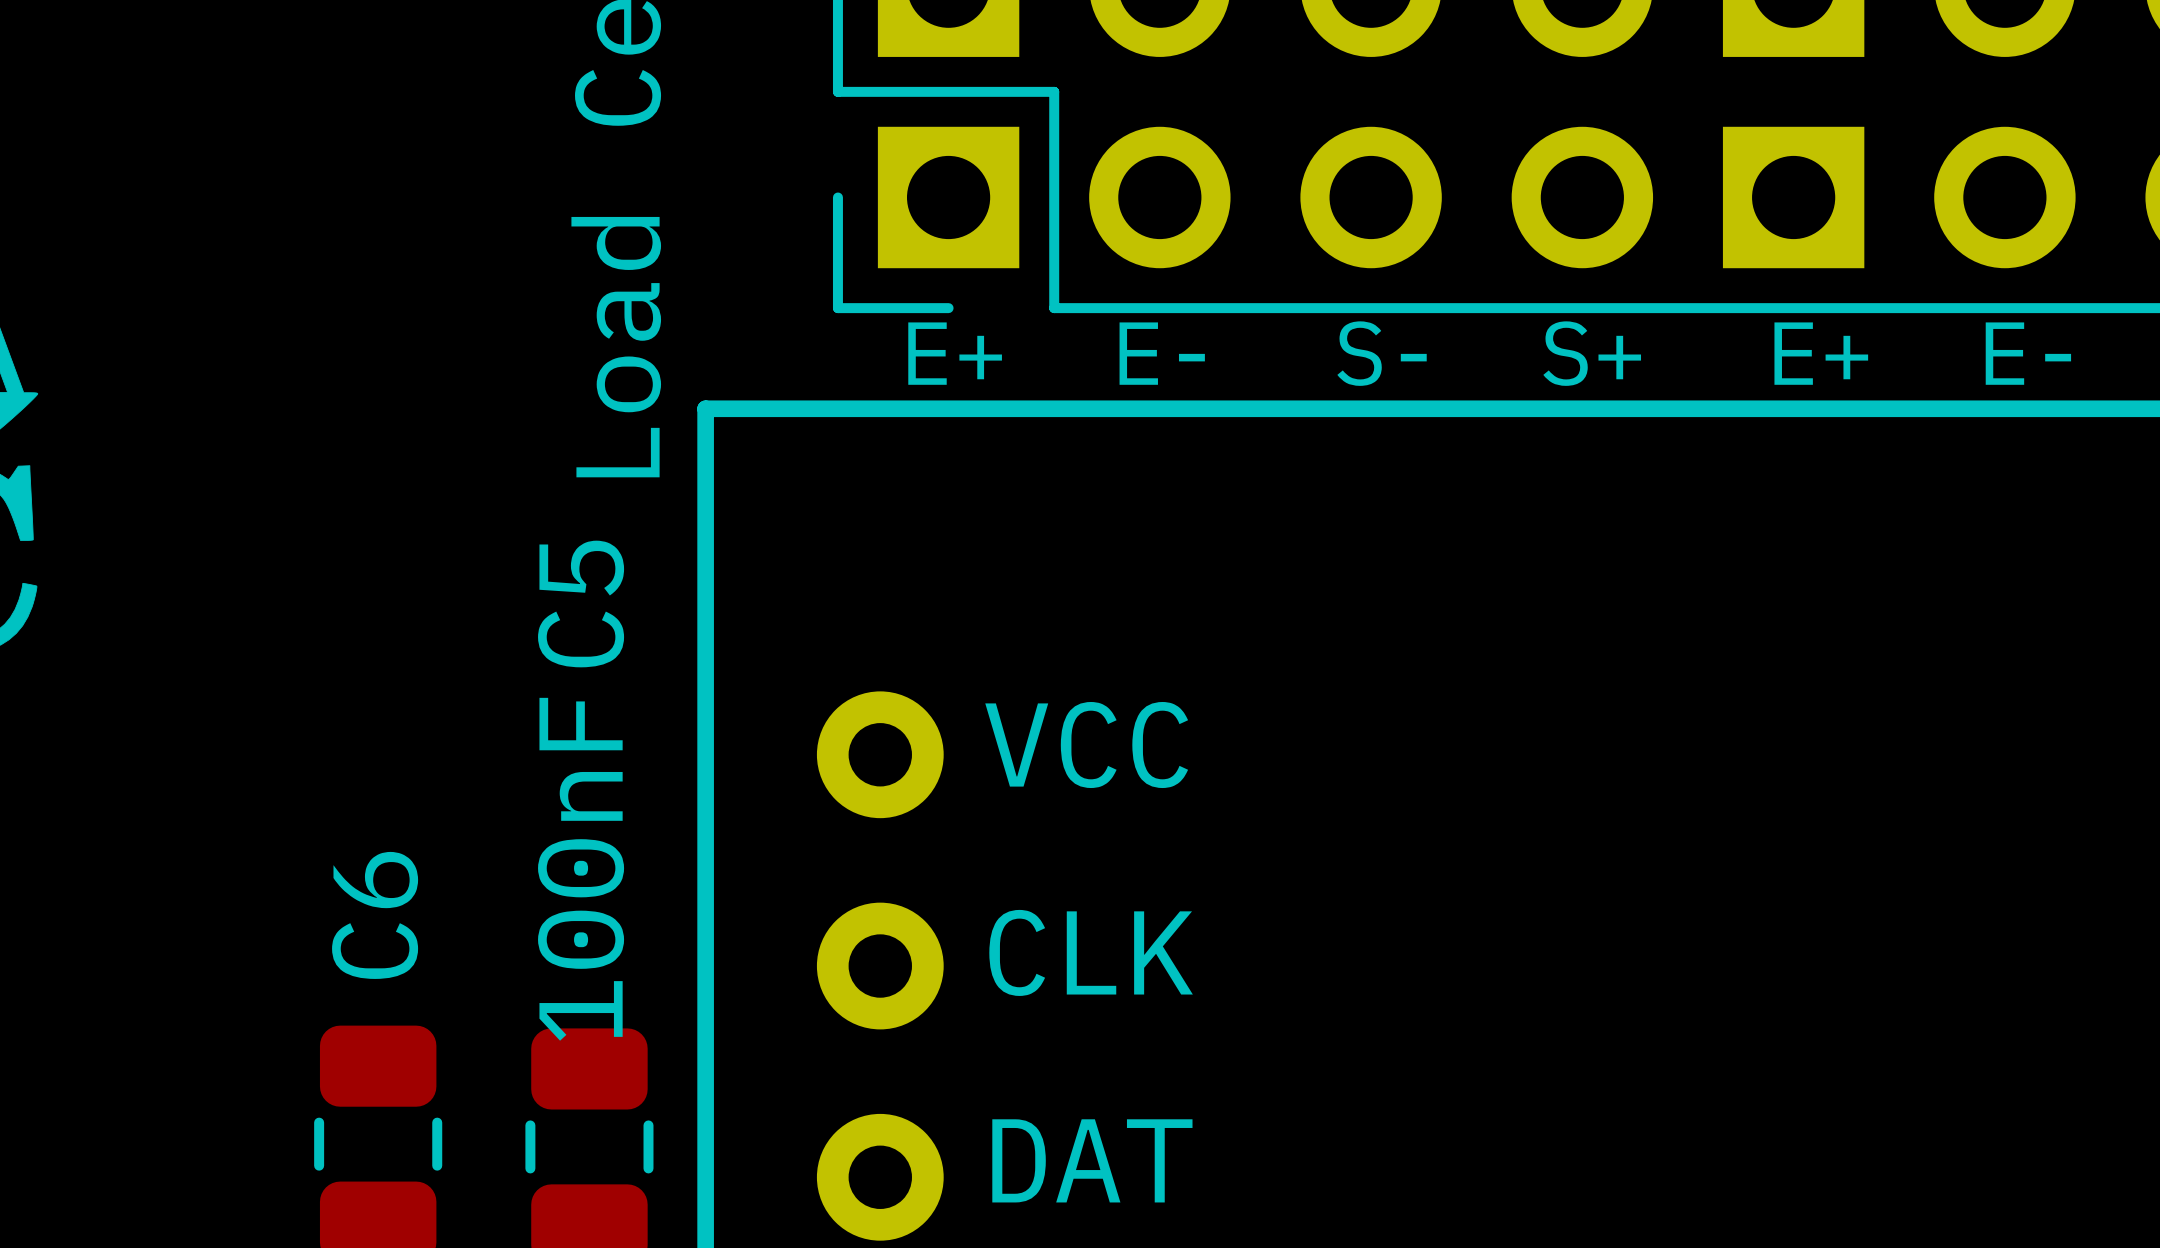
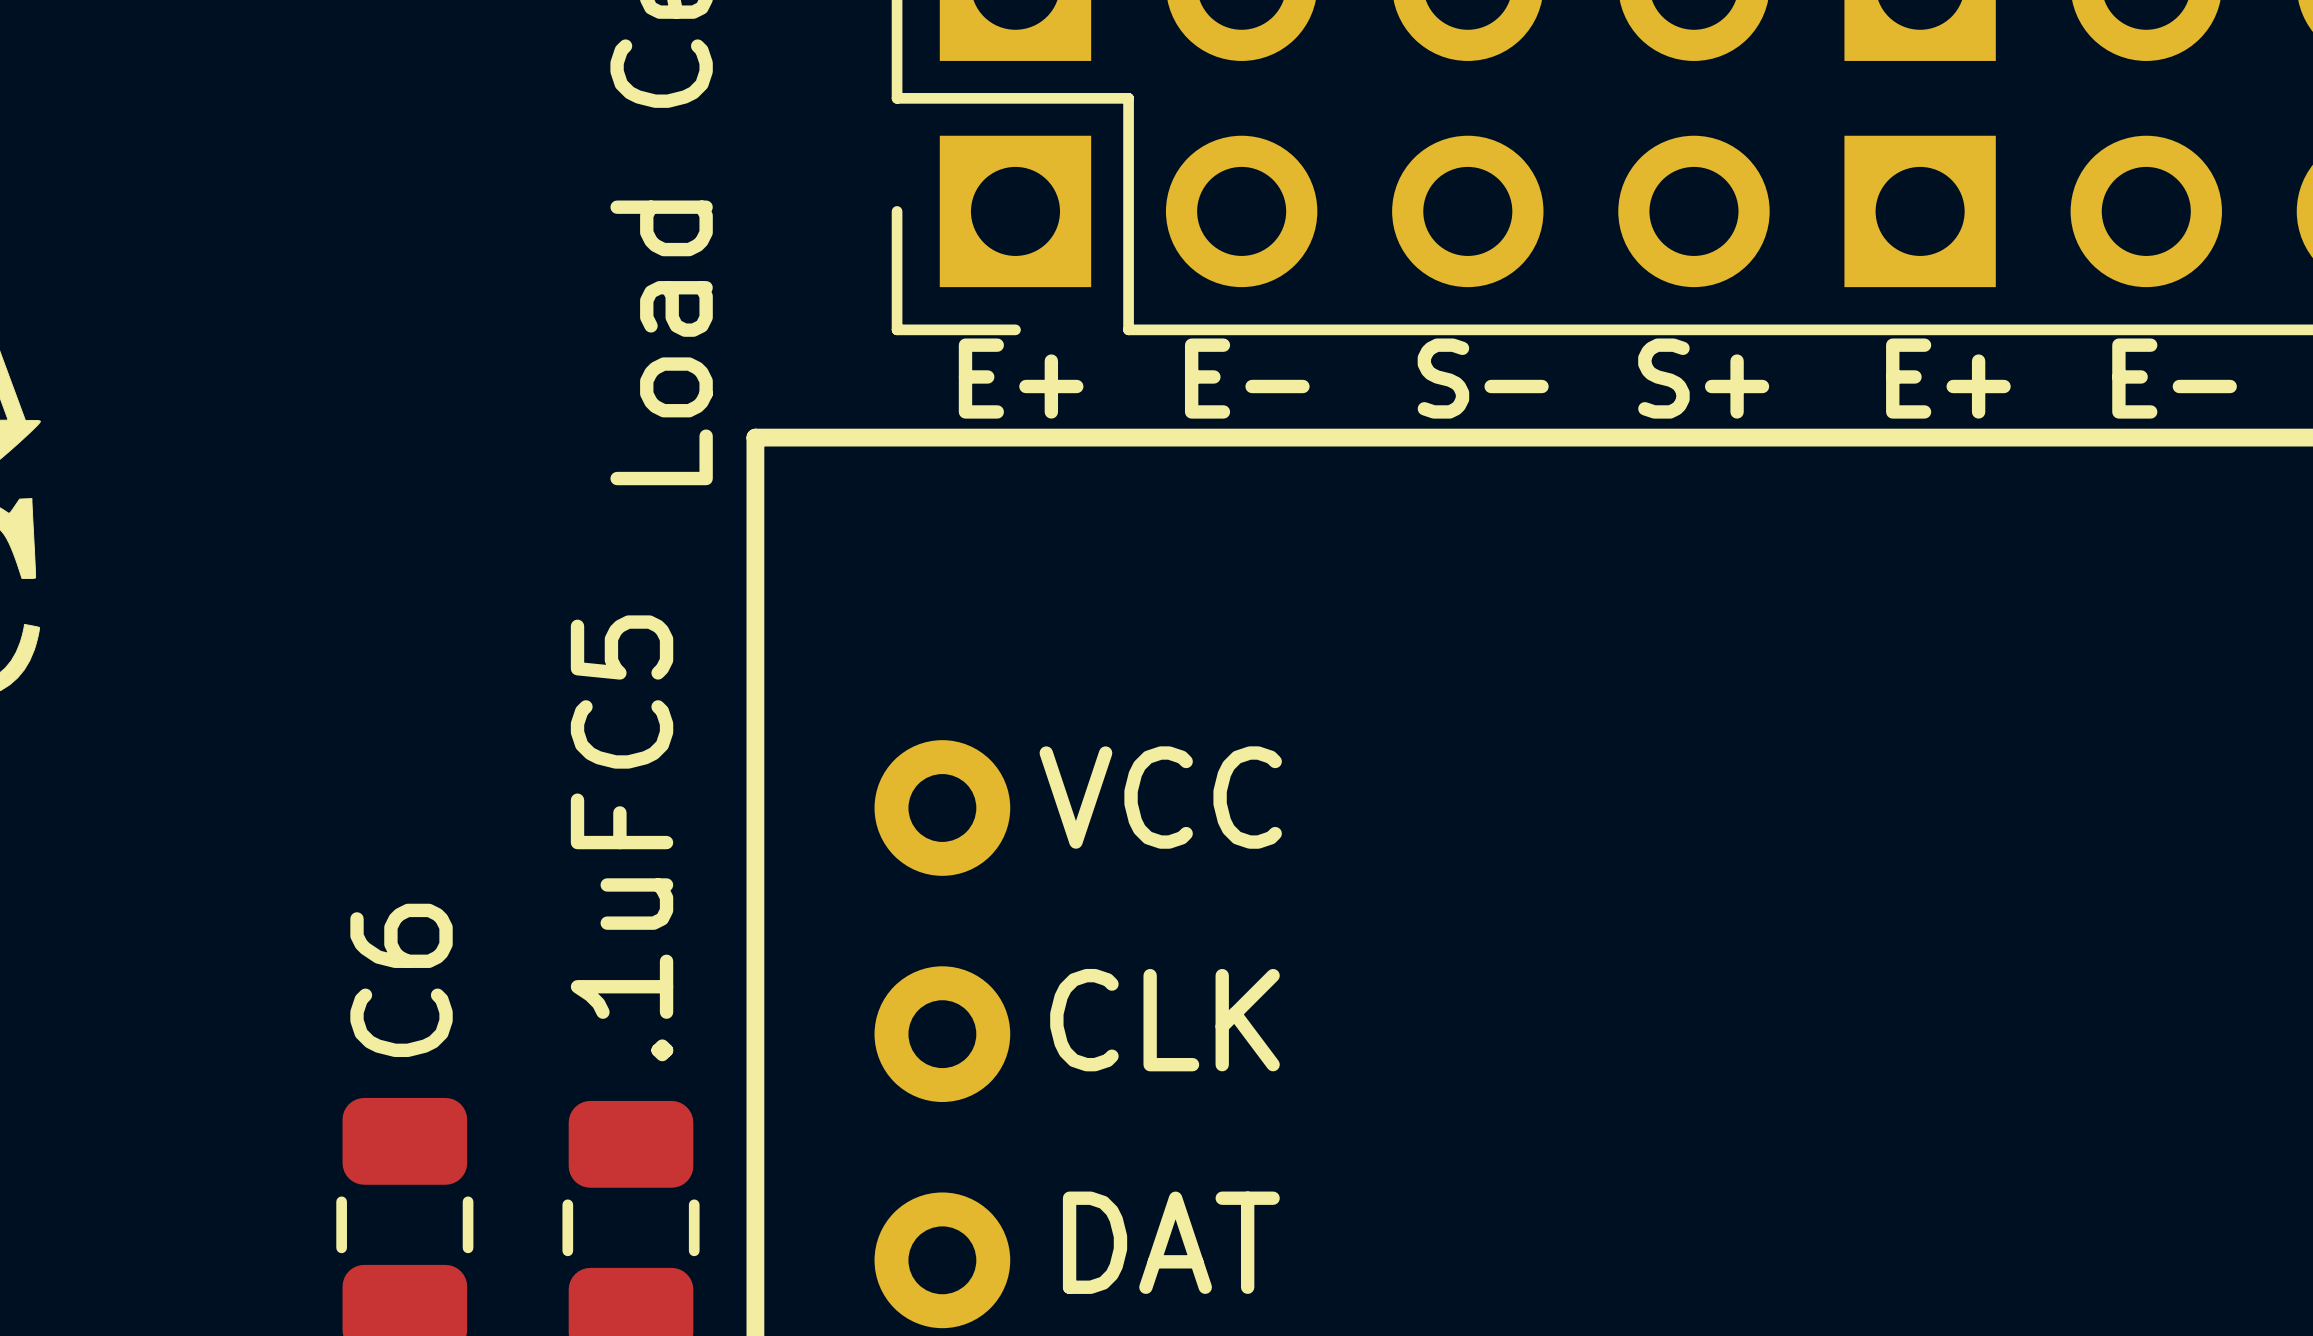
C5 name position: C5 (581, 604) -> C5 (622, 692)
C5 value: 100nF (581, 869) -> .1uF (622, 927)

